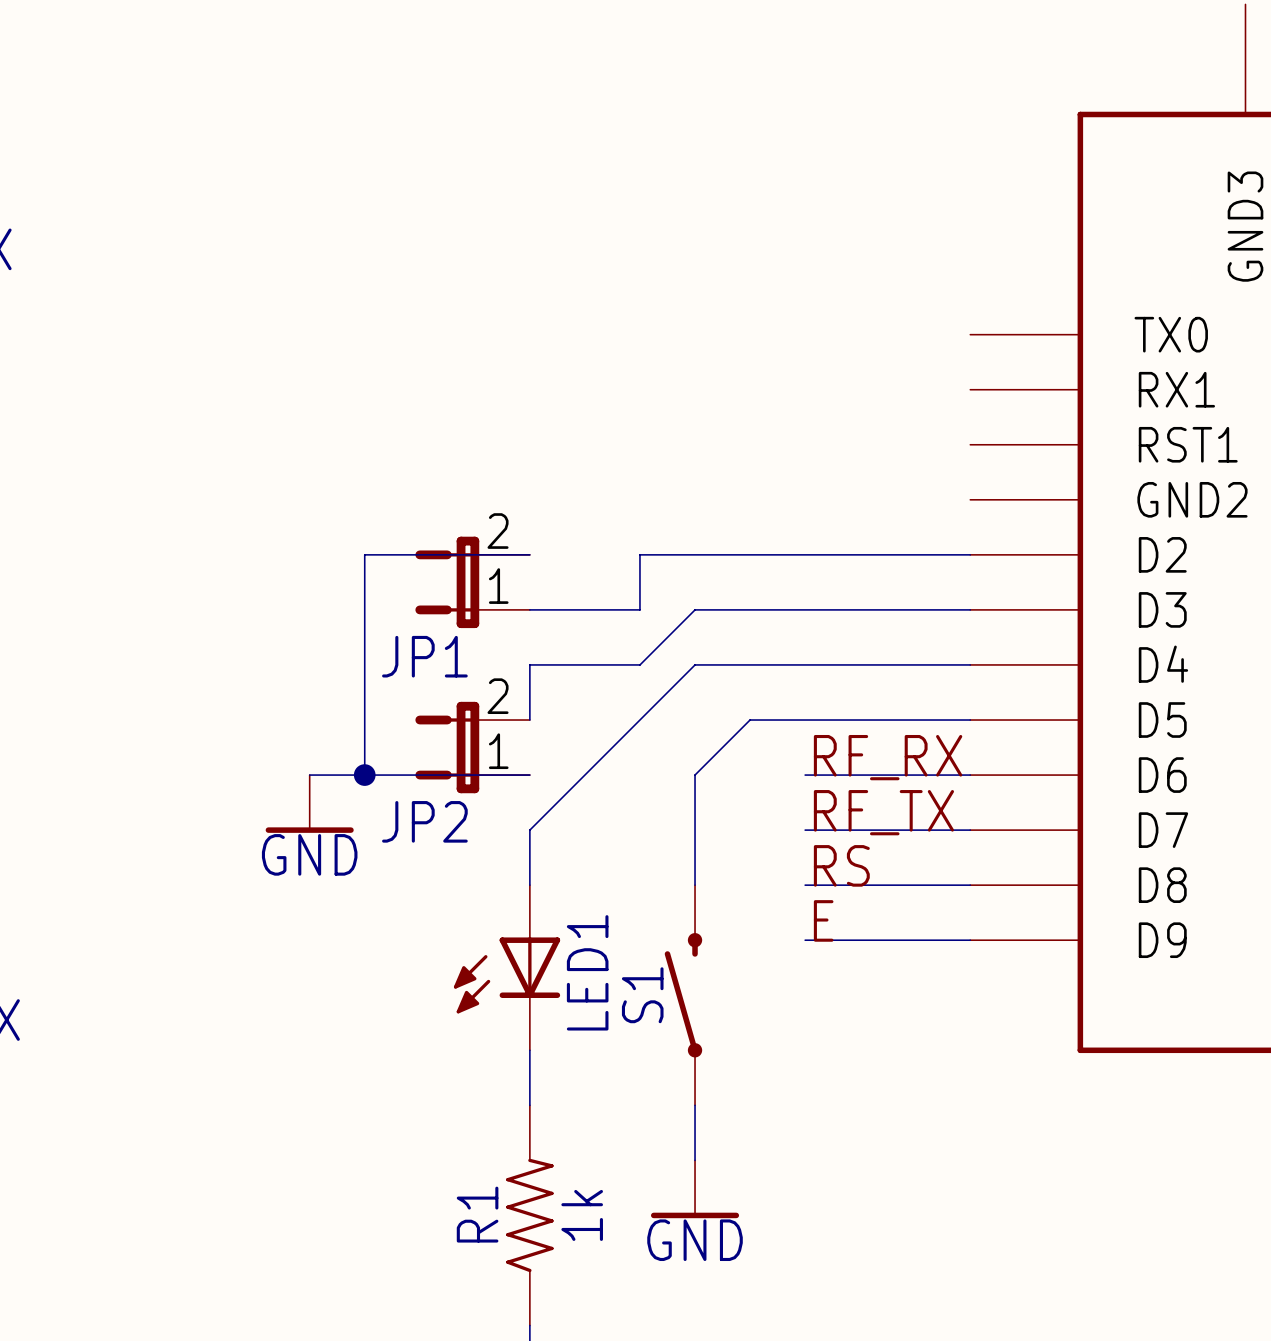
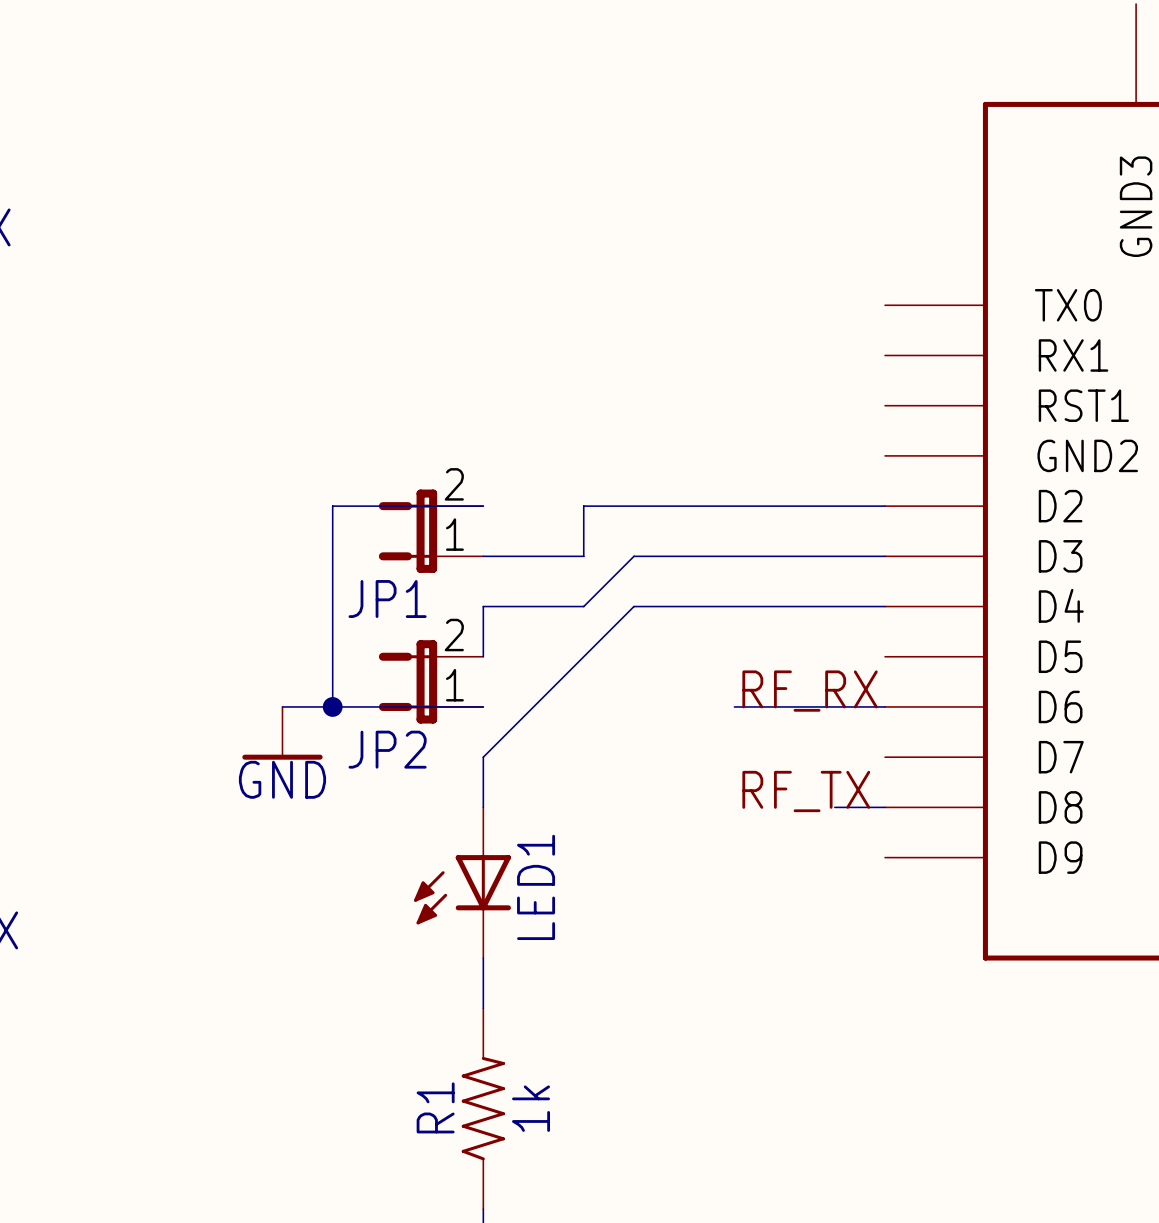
wire: (970, 720) (750, 720) (695, 775) (695, 885) -> none
label: RF_TX (883, 812) -> none
wire: (805, 830) (970, 830) -> none
label: RS (841, 865) -> RF_TX (806, 791)
wire: (805, 885) (915, 885) -> none
label: E (823, 920) -> none
wire: (805, 940) (970, 940) -> none
S1: (683, 995) -> none
wire: (695, 1105) (695, 1160) -> none
power symbol: GND (695, 1189) -> none

